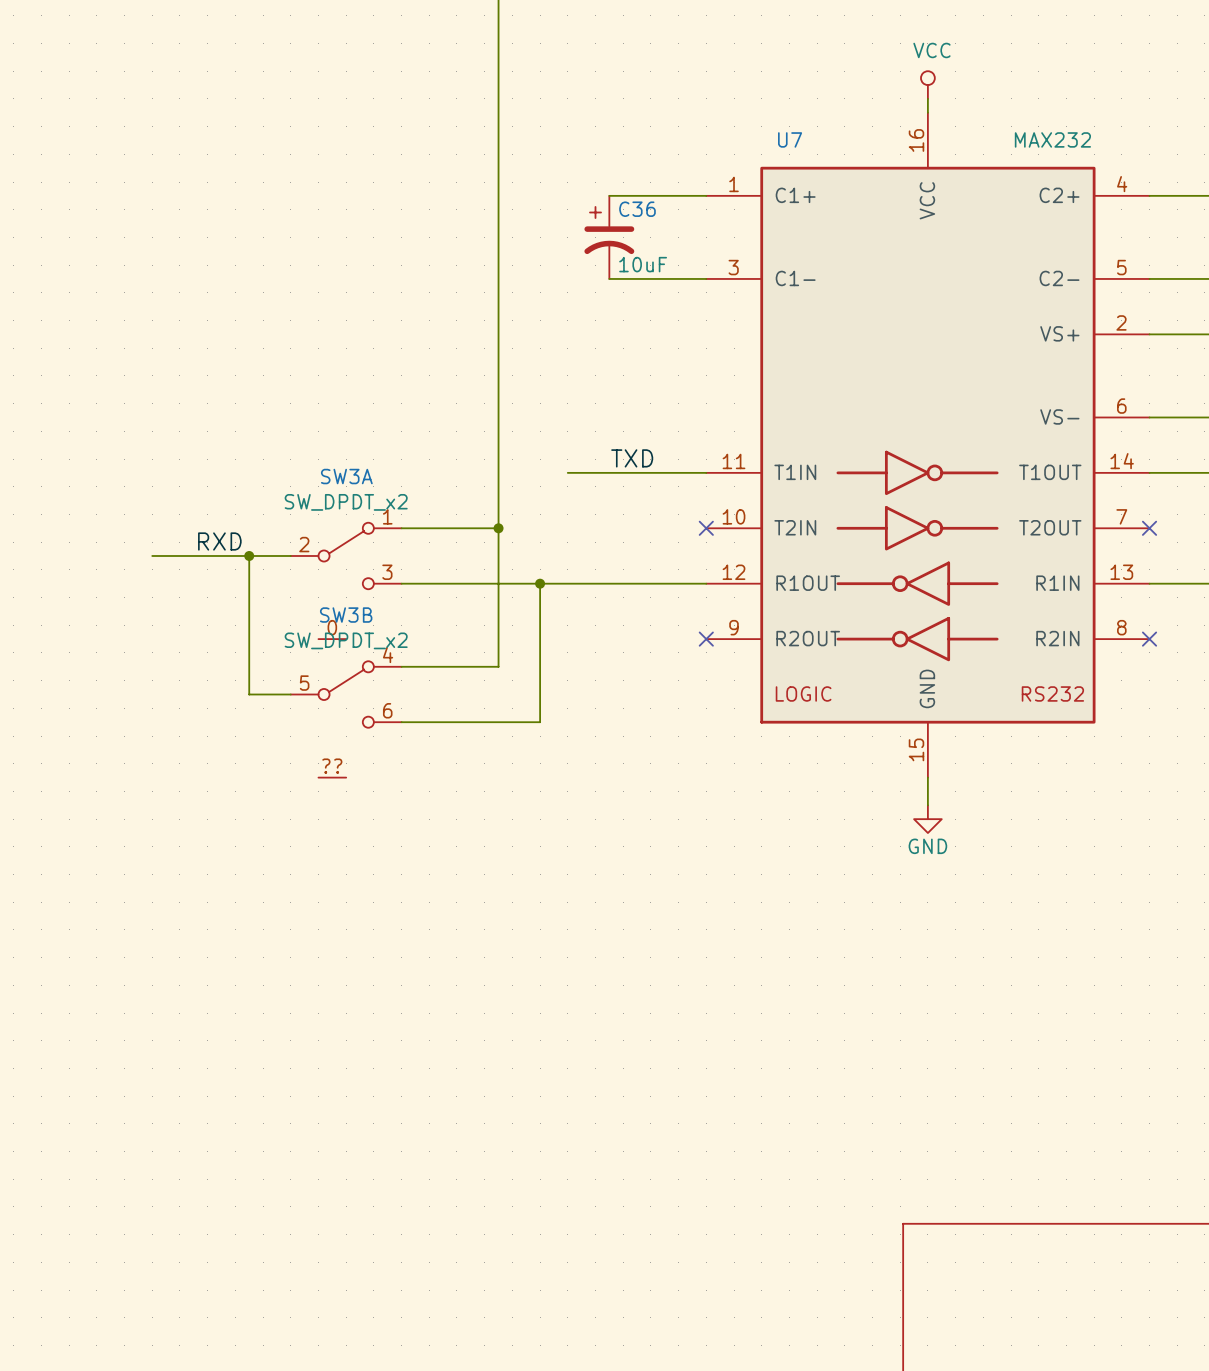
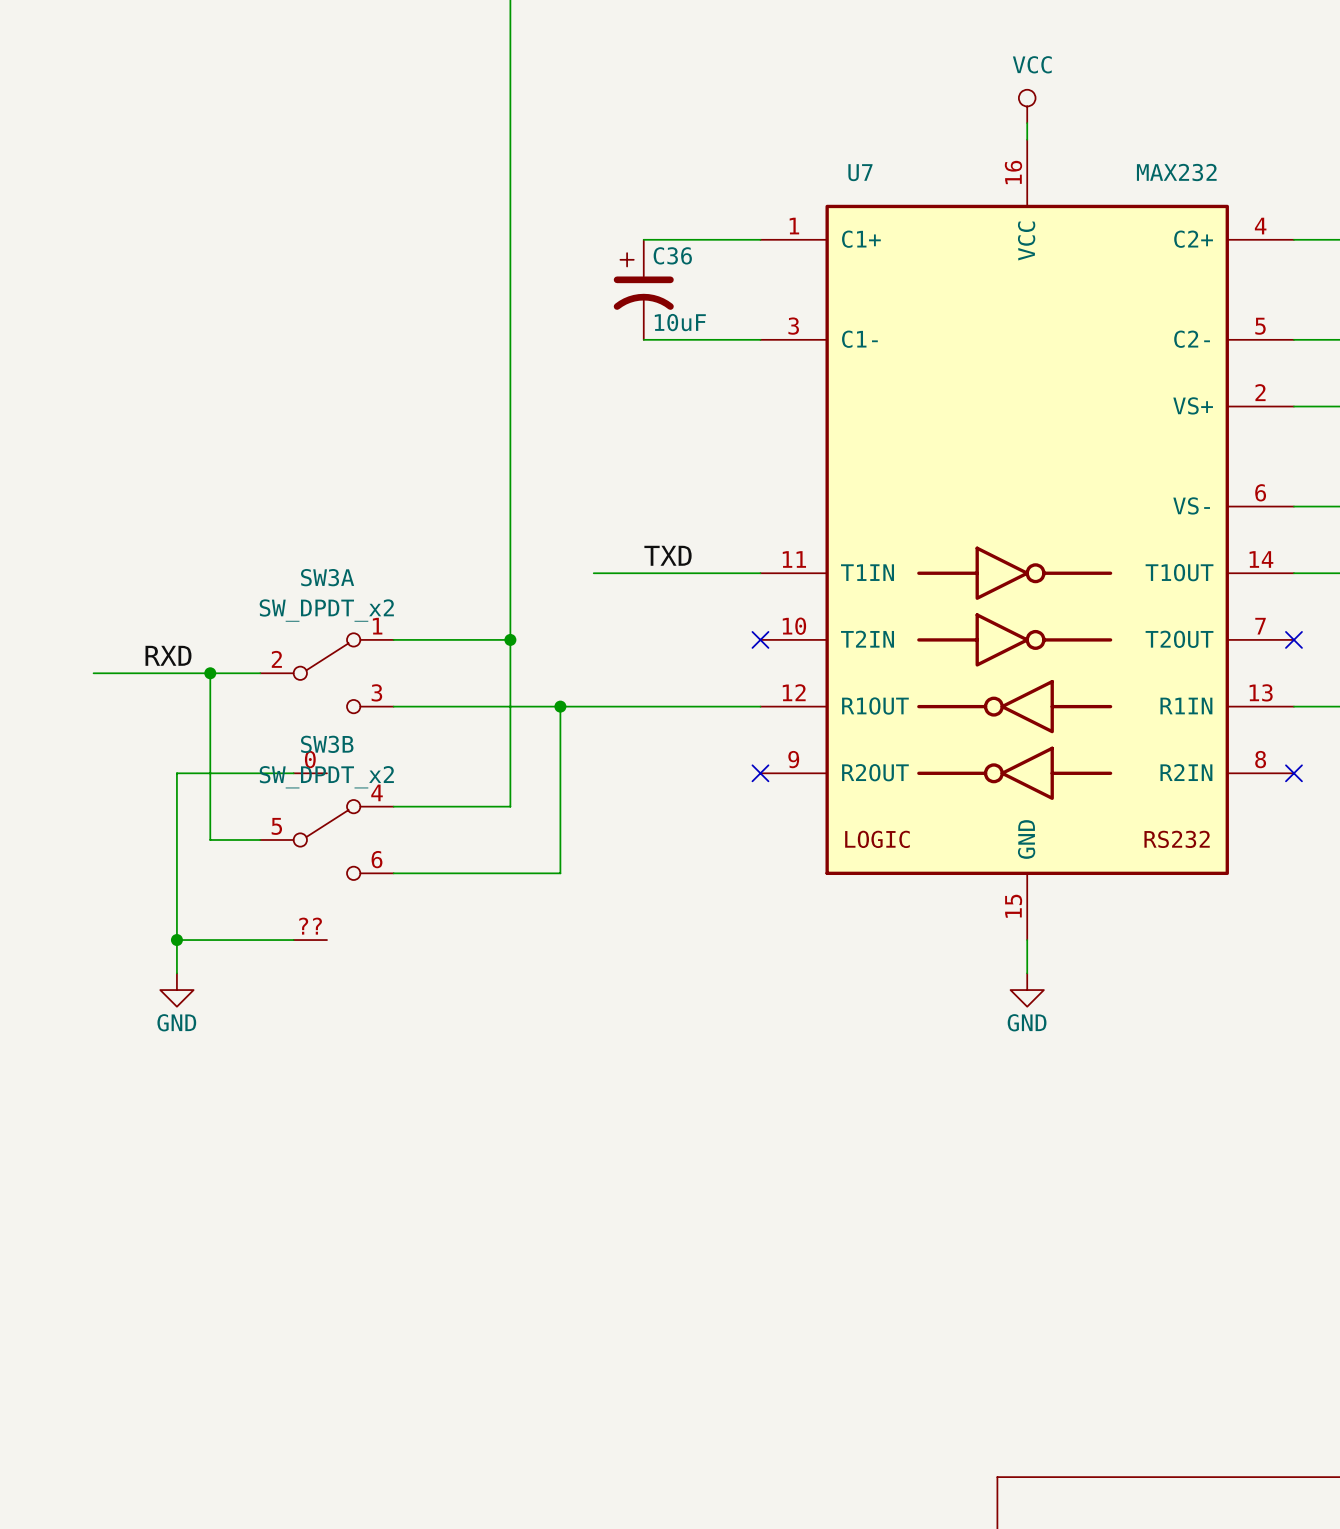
wire: none -> (293, 773) (176, 773) (176, 973)
wire: none -> (176, 940) (293, 940)
junction: none -> (176, 940)
power symbol: none -> GND (176, 990)

